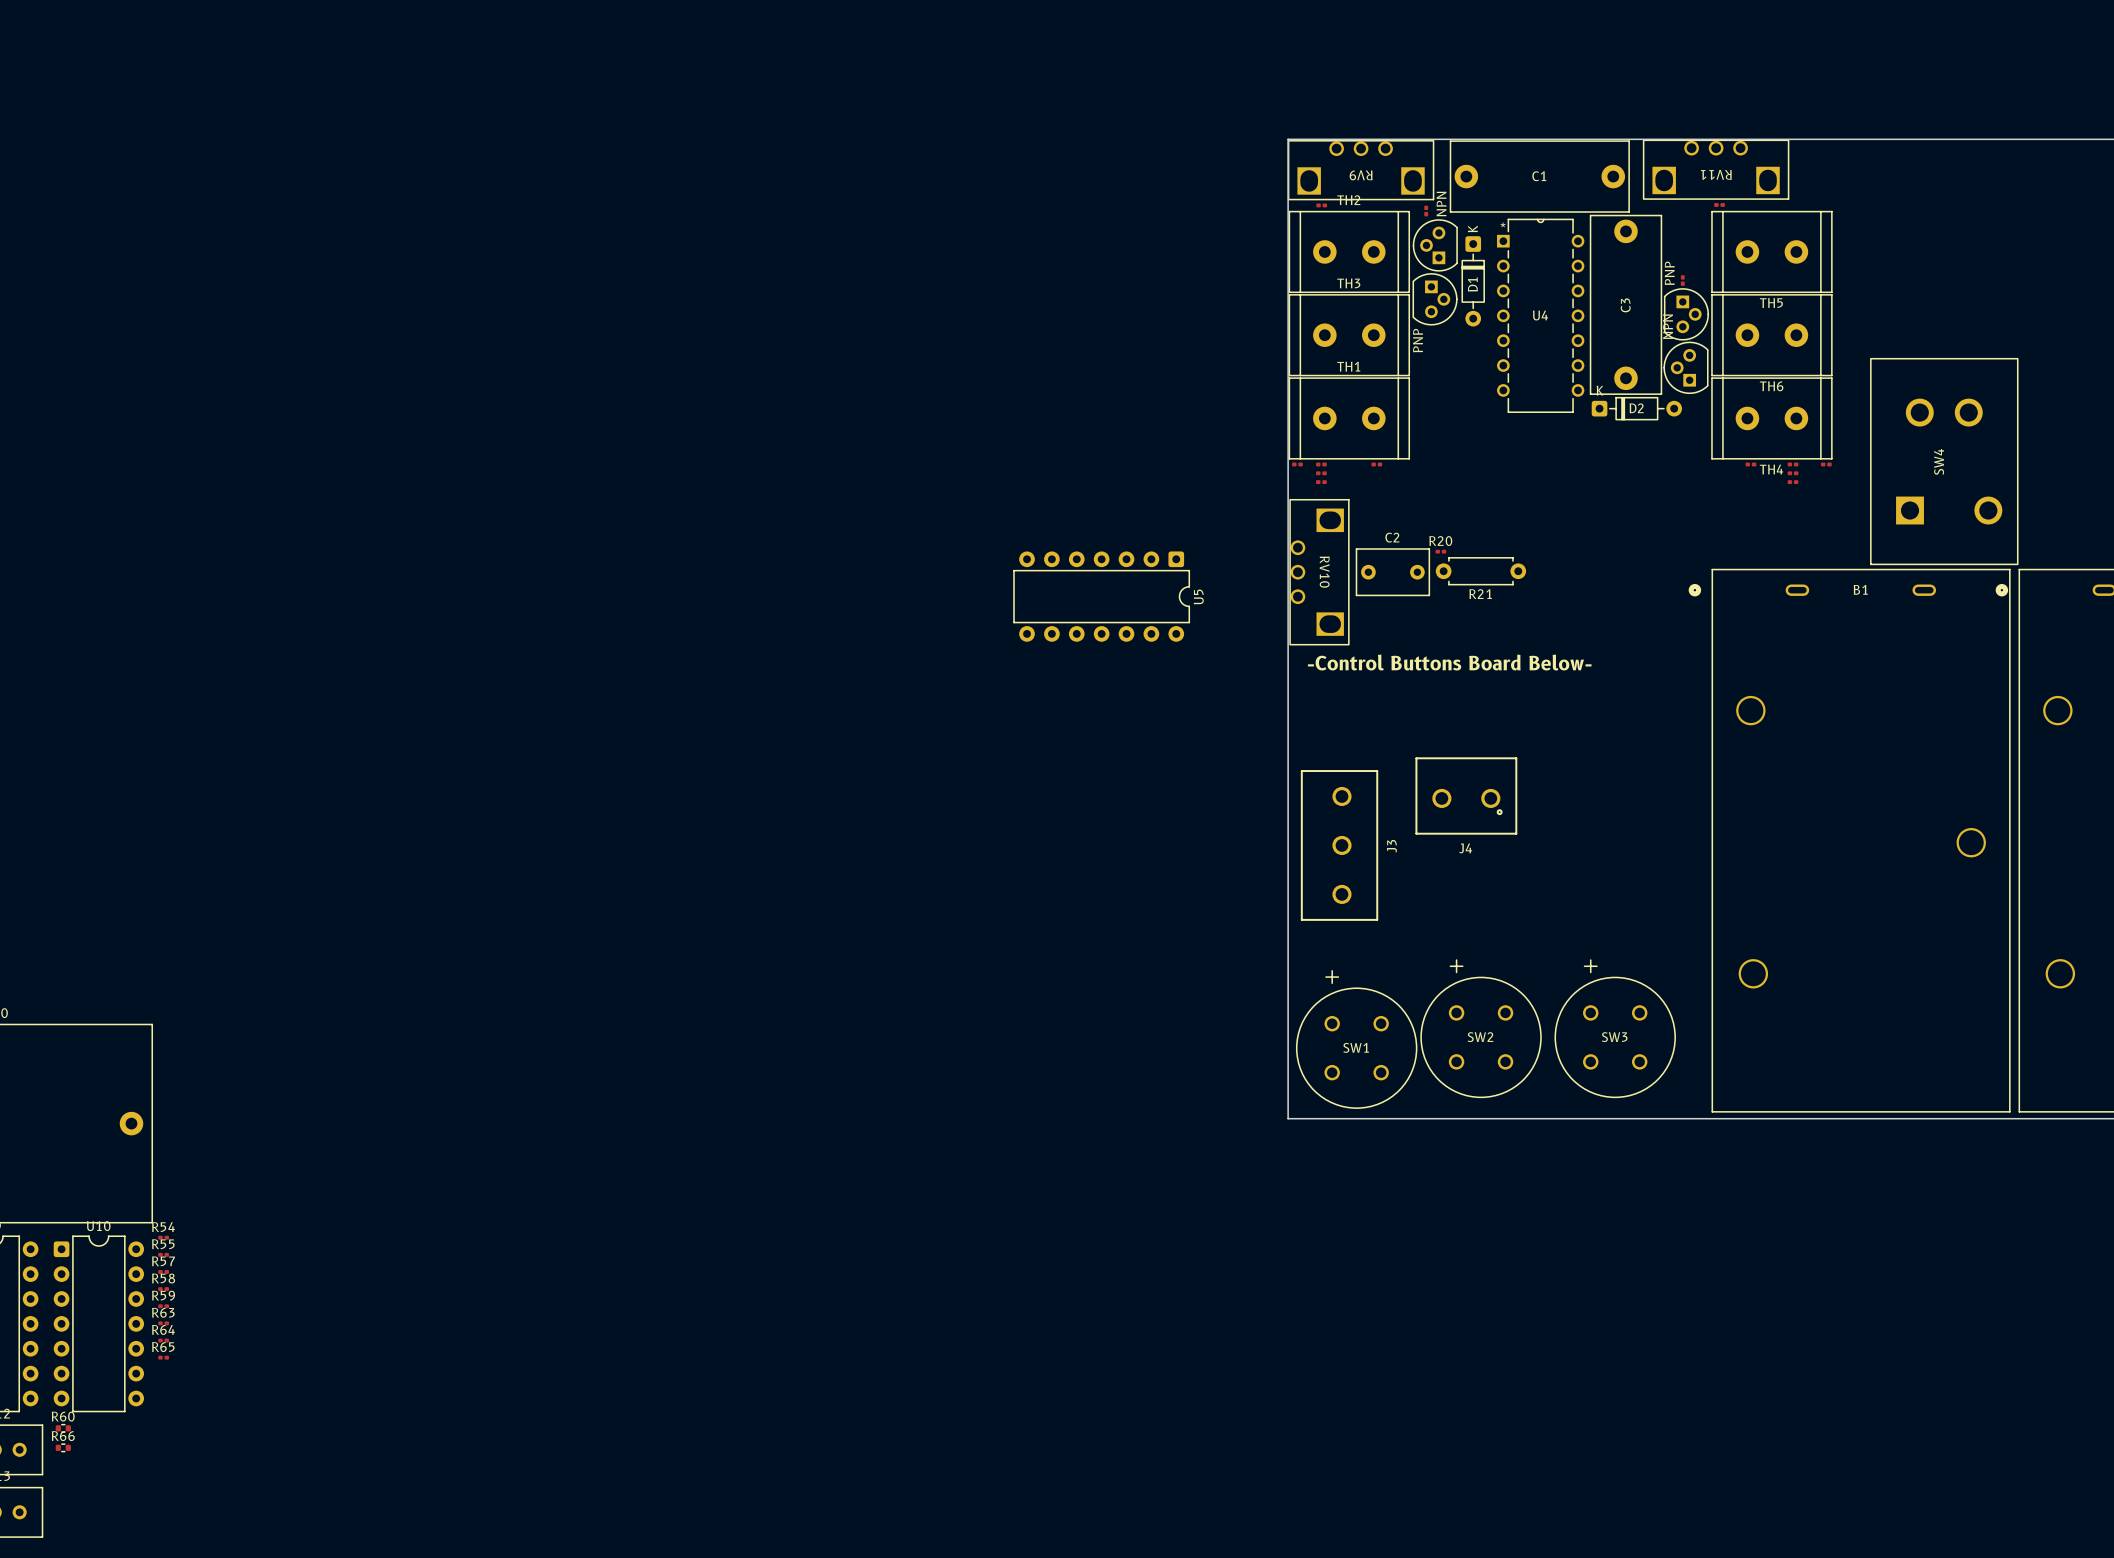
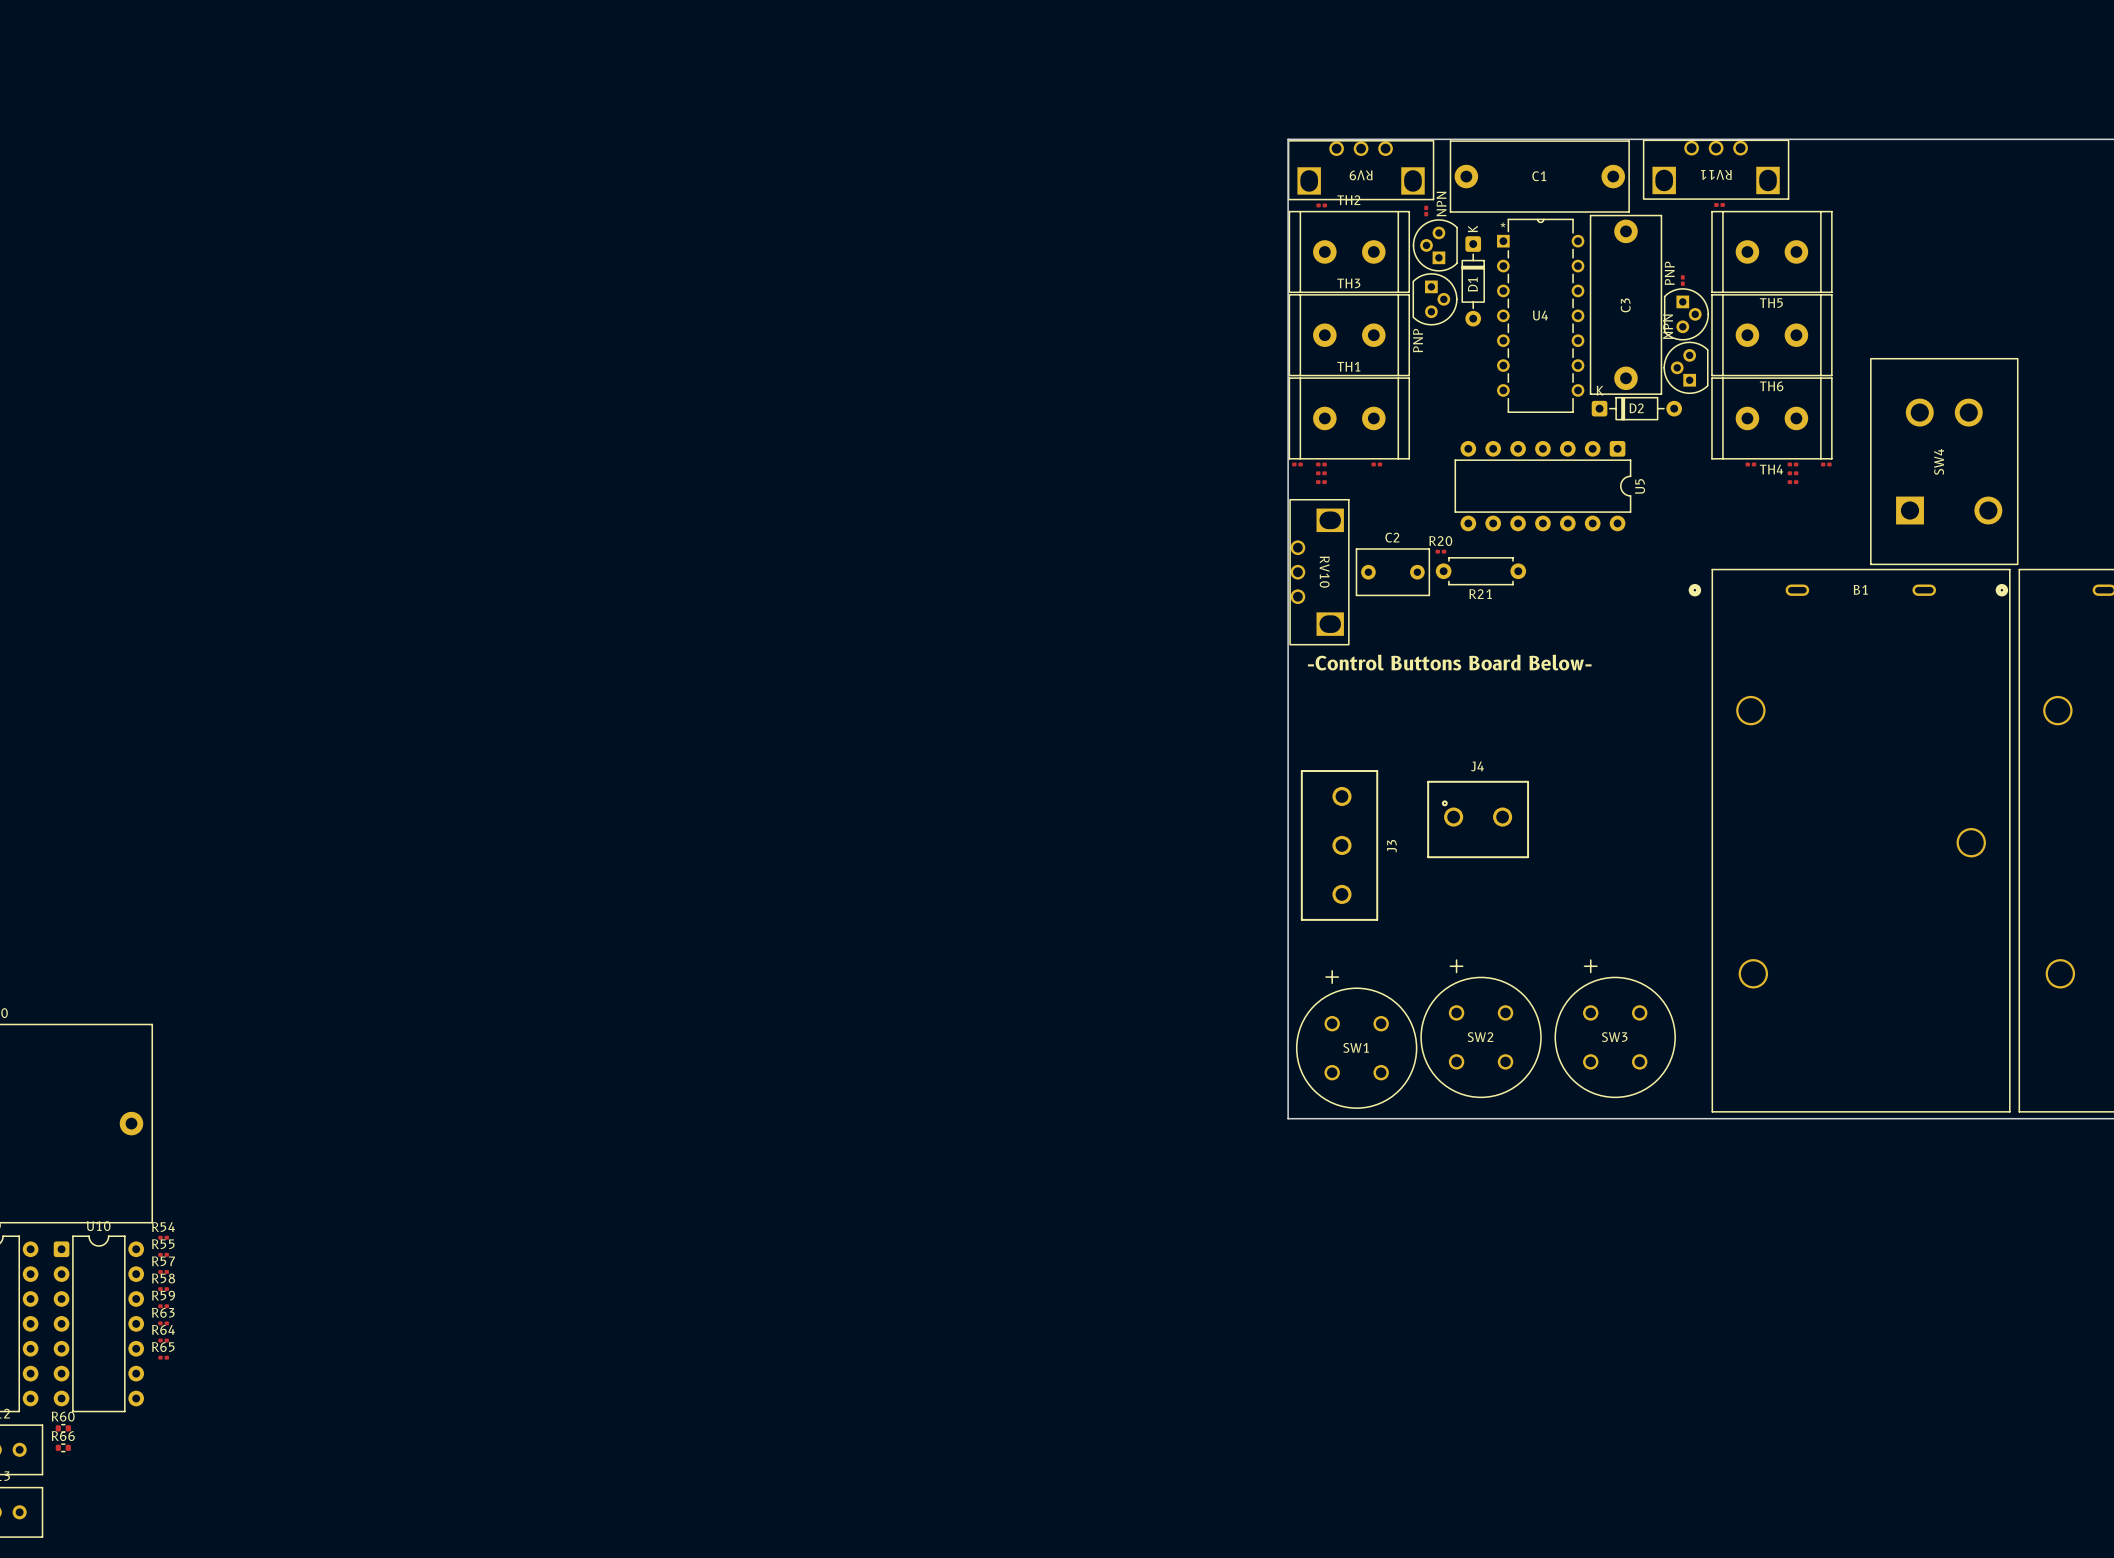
U5 position: (1101, 596) -> (1542, 486)
J4 rotation: 0° (1466, 796) -> 180° (1478, 819)

